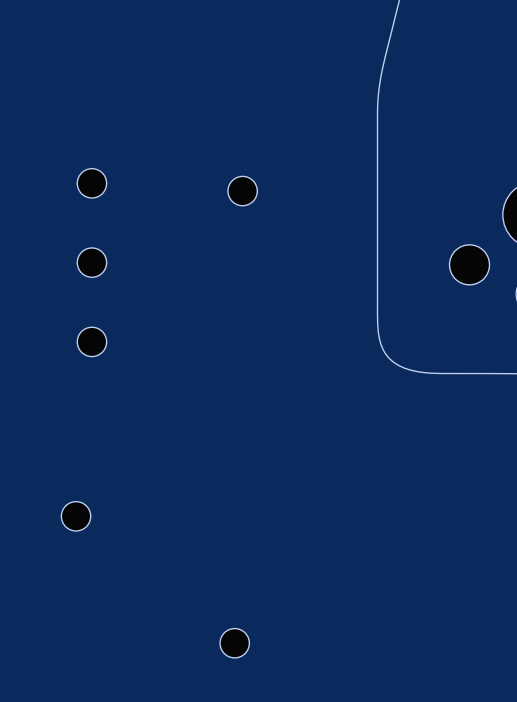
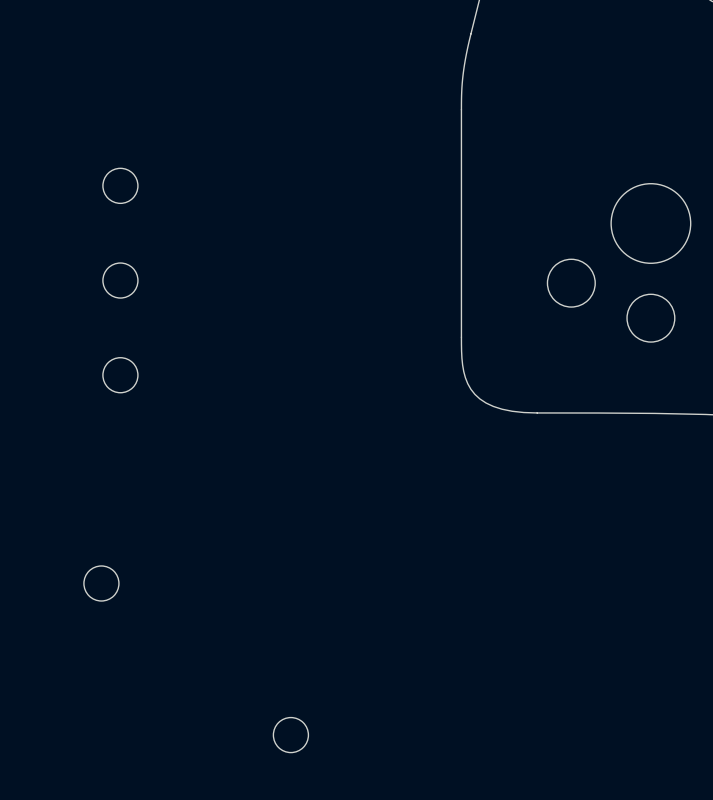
part: (242, 191) -> none

